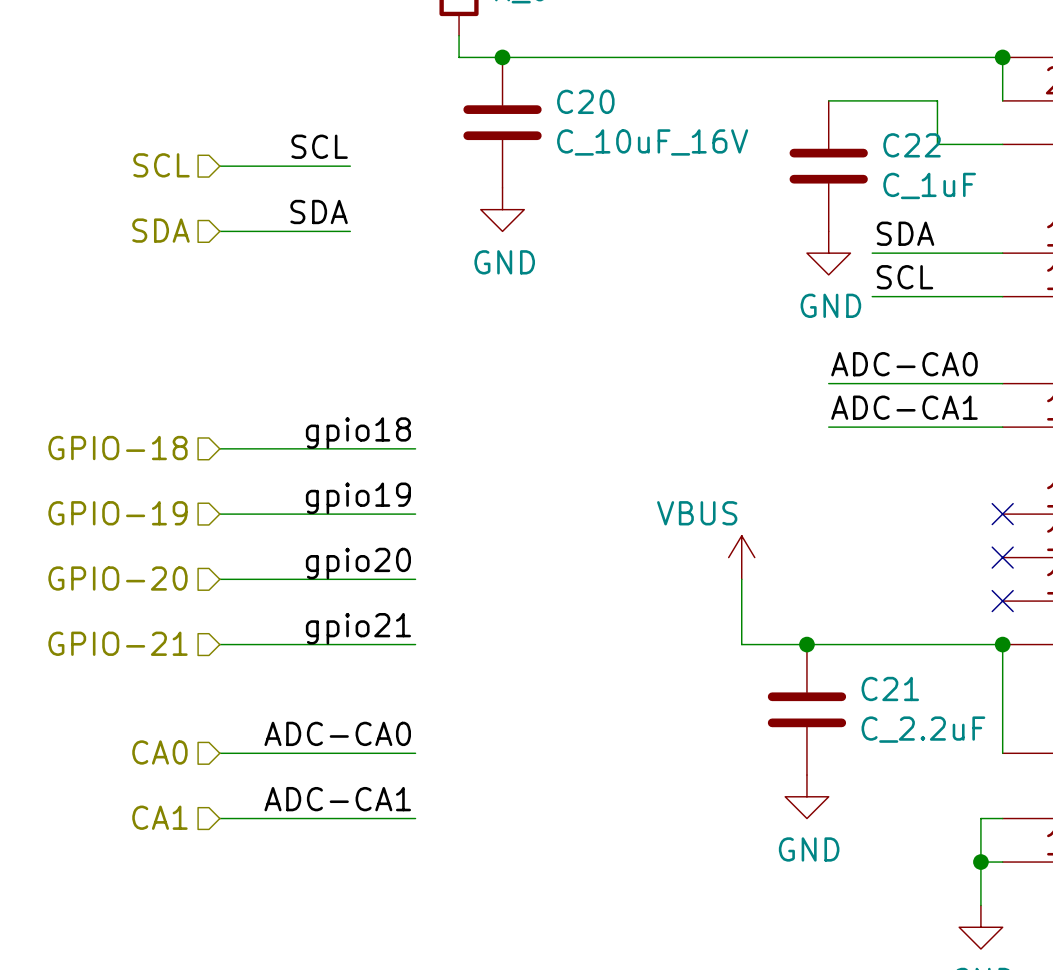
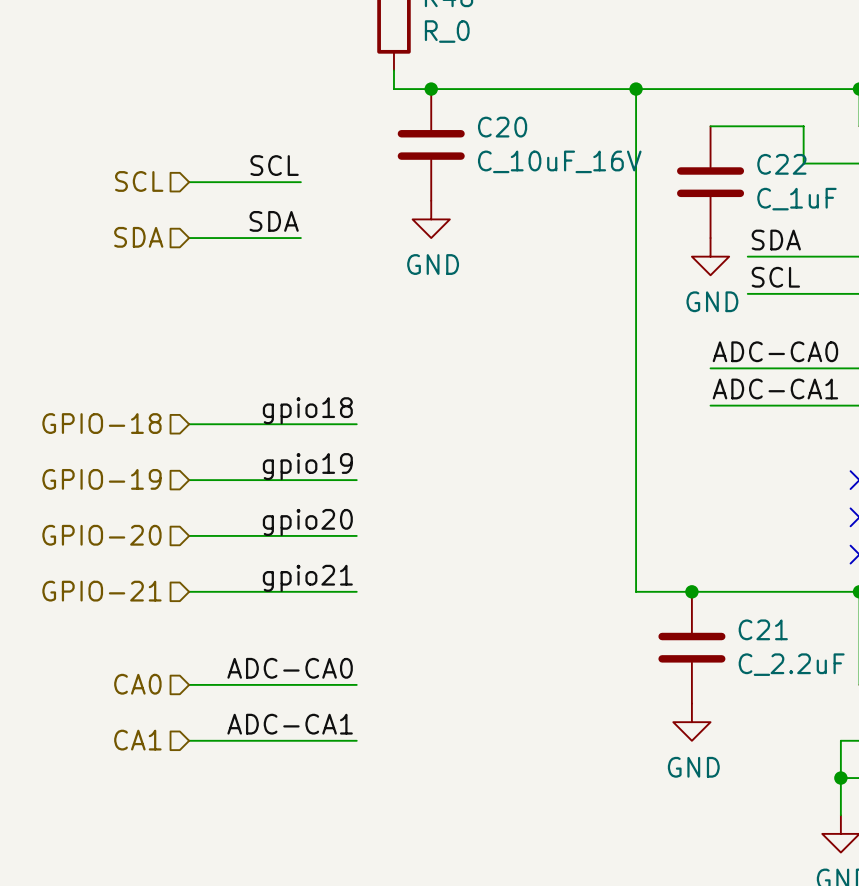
wire: none -> (636, 89) (636, 535)
junction: none -> (636, 89)
power symbol: VBUS (741, 557) -> none

